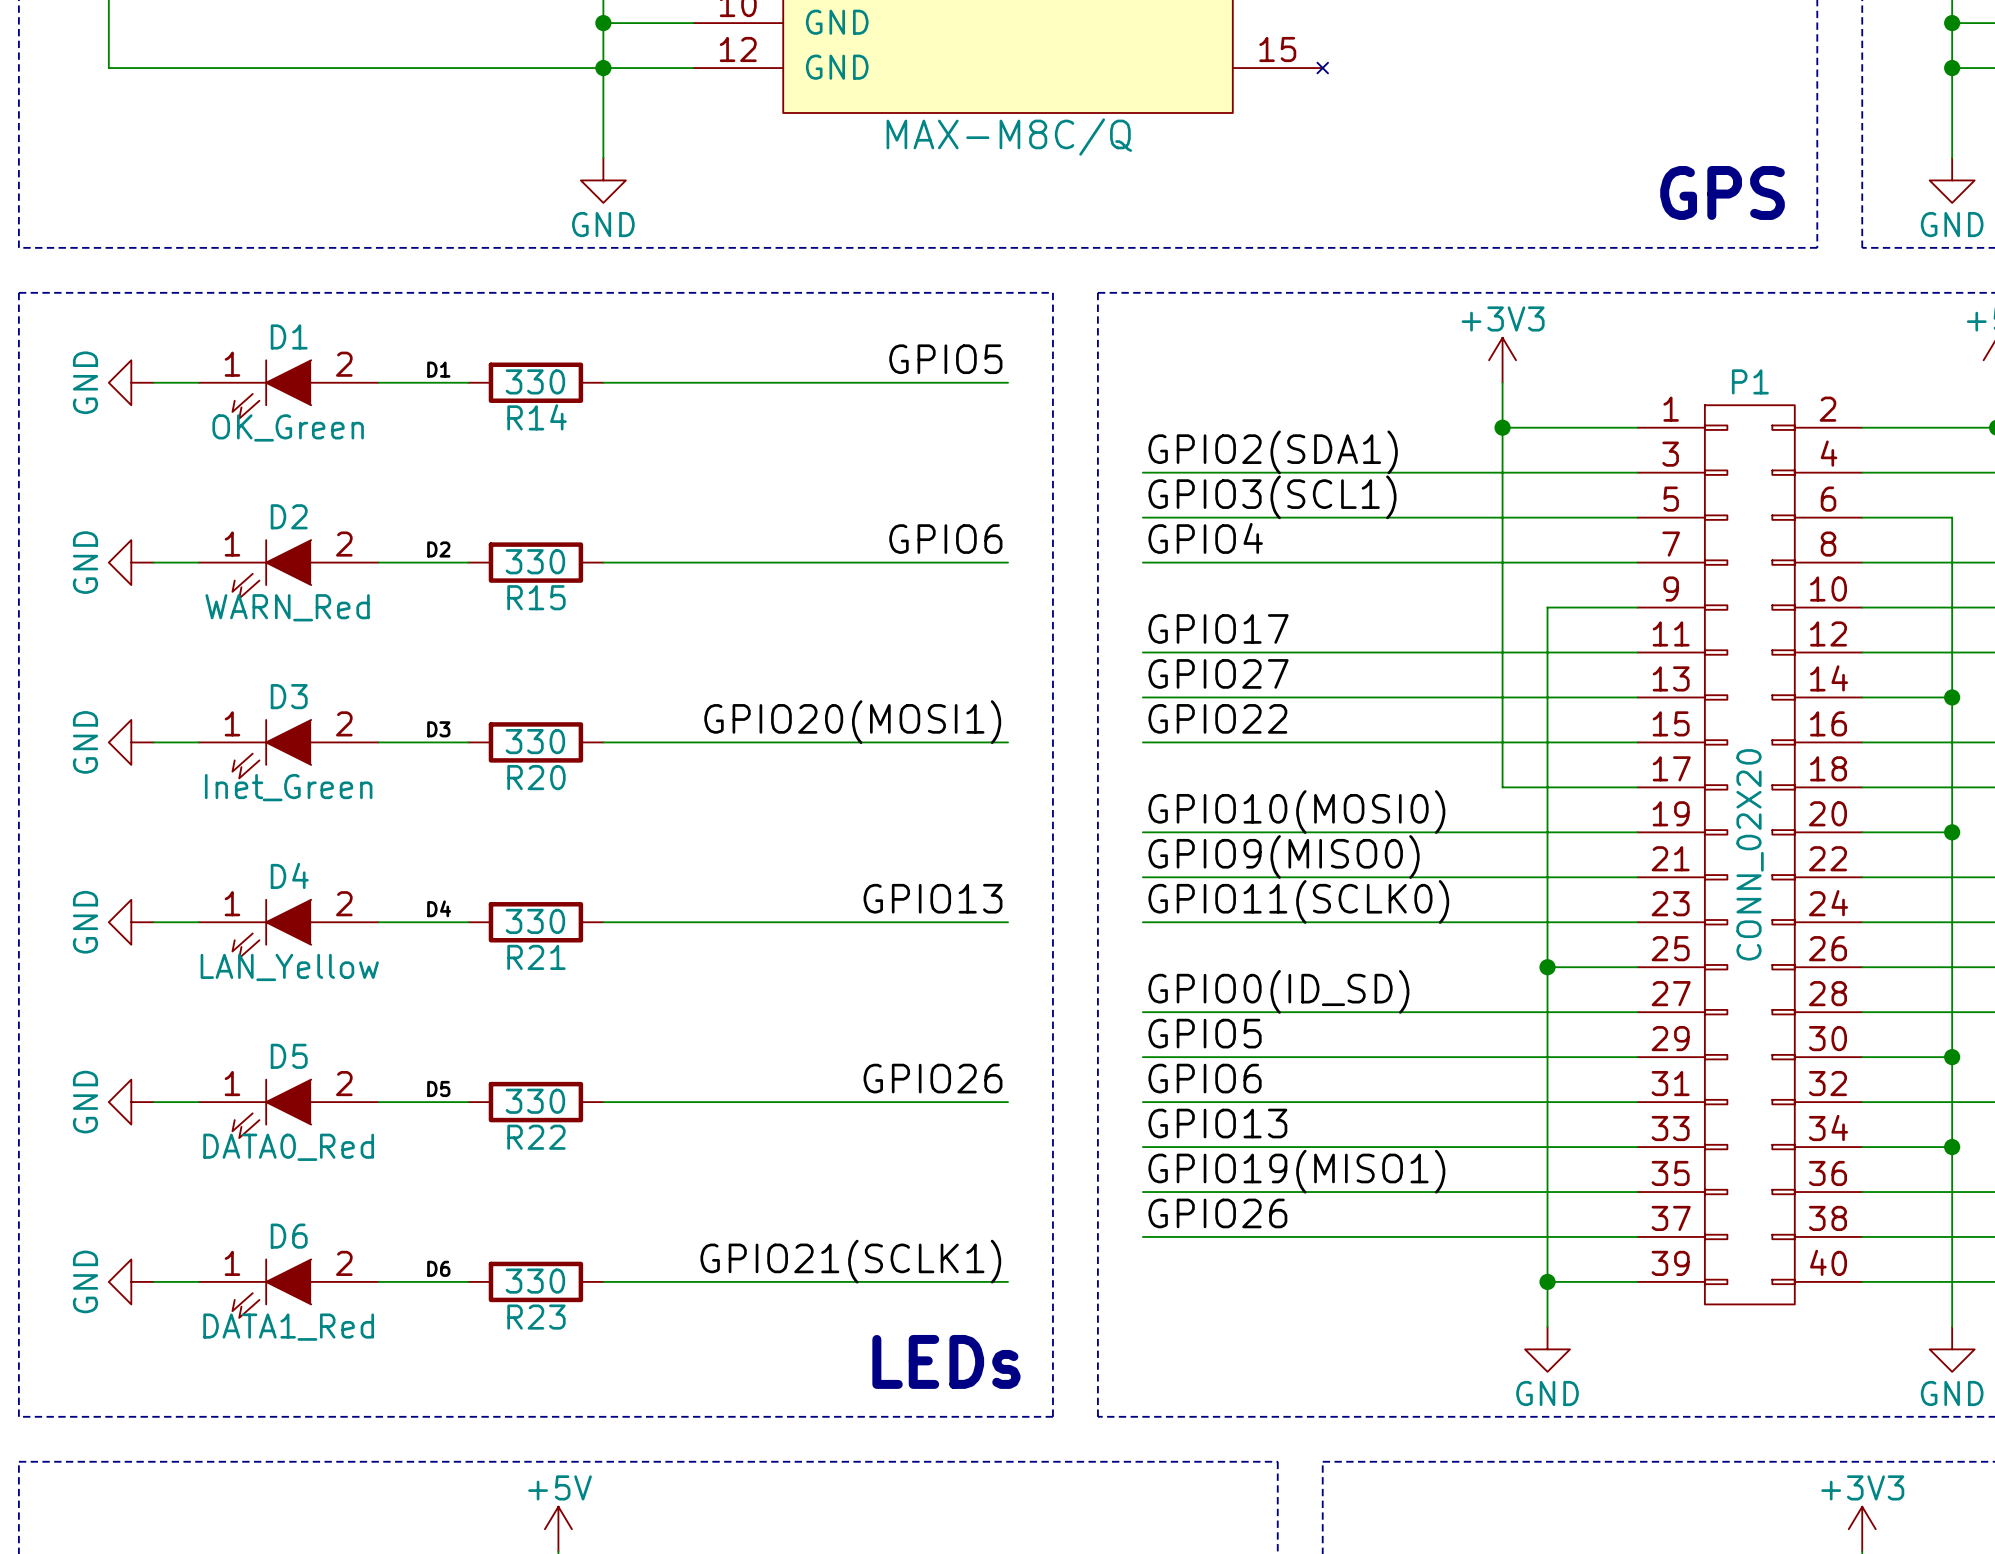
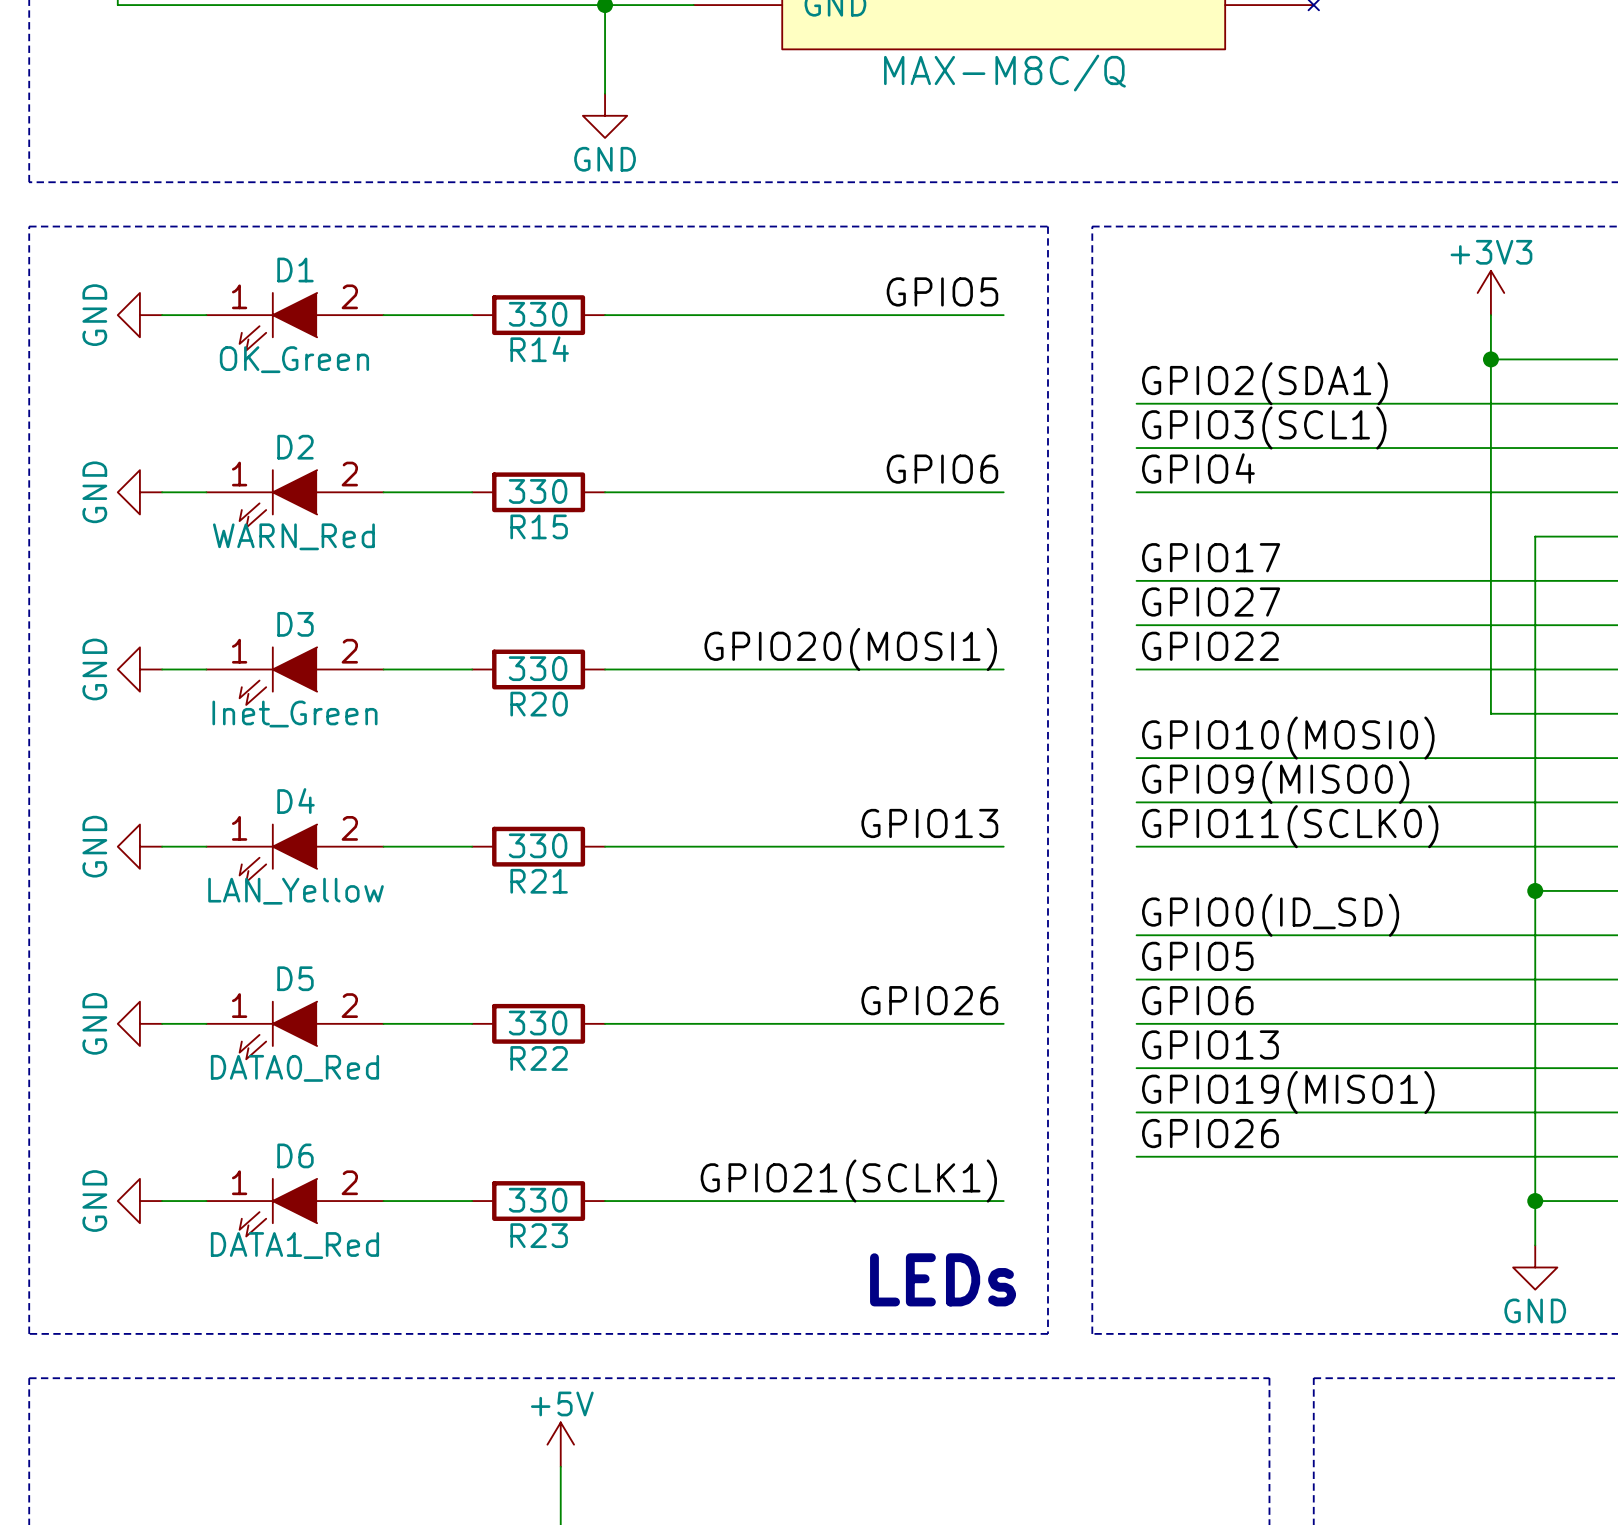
label: D1 (438, 369) -> none
label: D2 (438, 549) -> none
label: D3 (438, 729) -> none
label: D4 (439, 908) -> none
label: D5 (438, 1088) -> none
label: D6 (438, 1268) -> none

